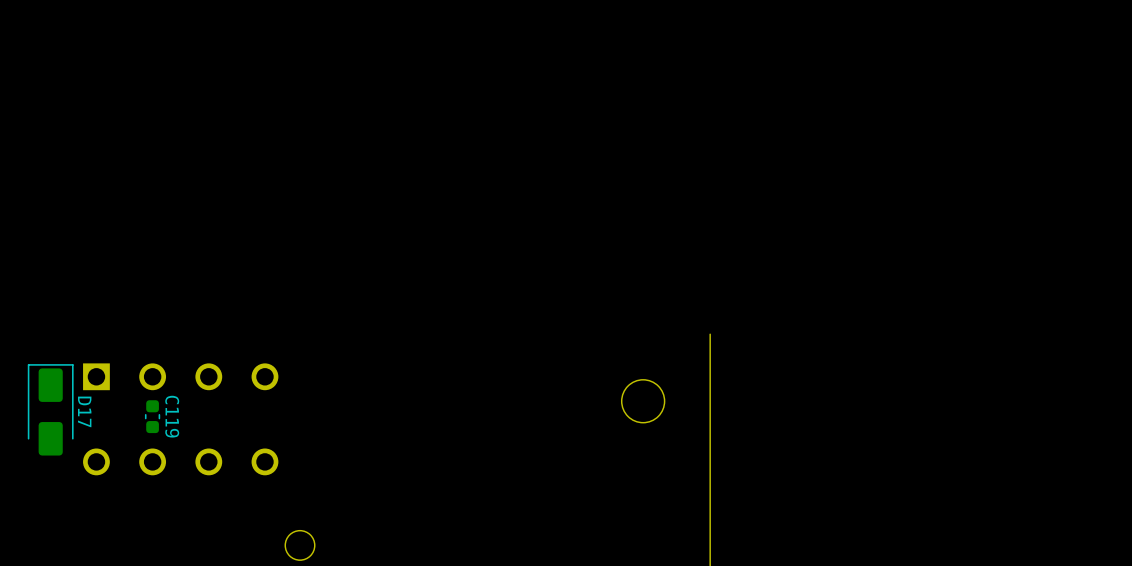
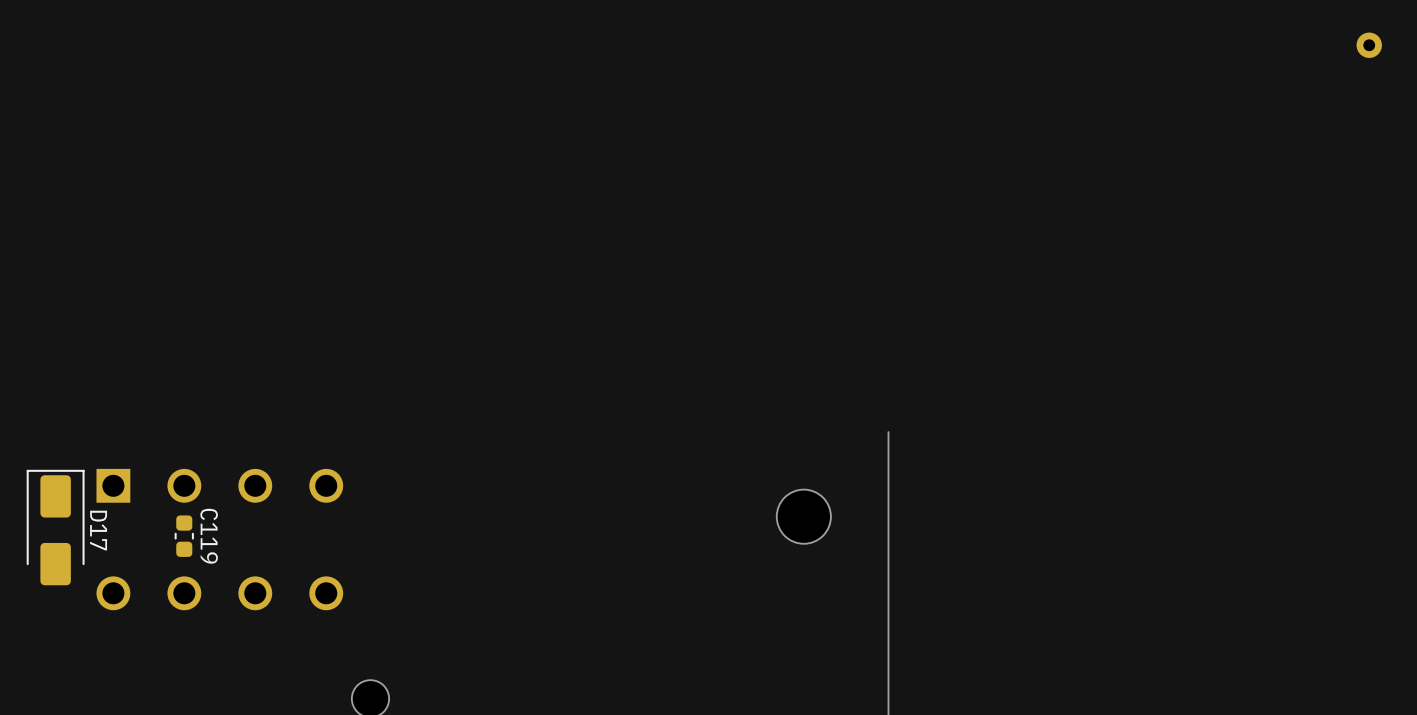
part: none -> (1369, 45)

